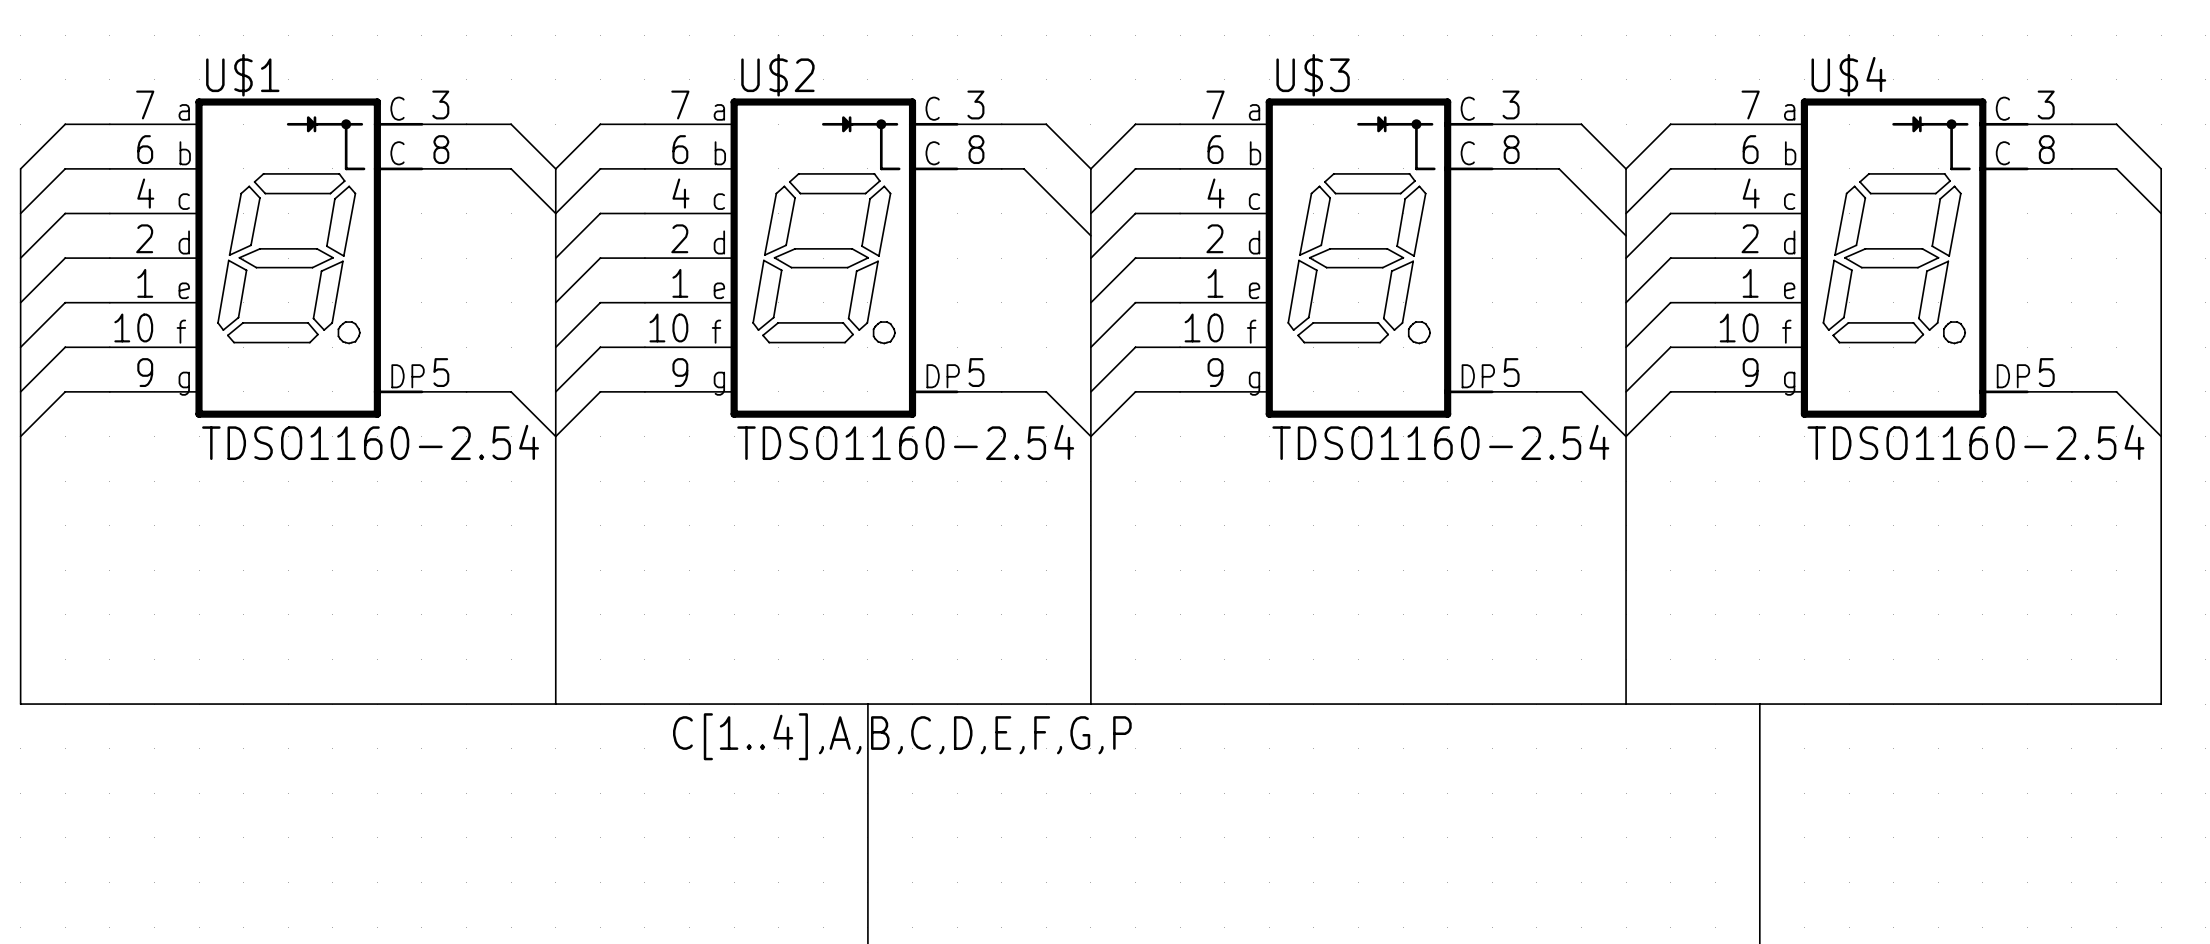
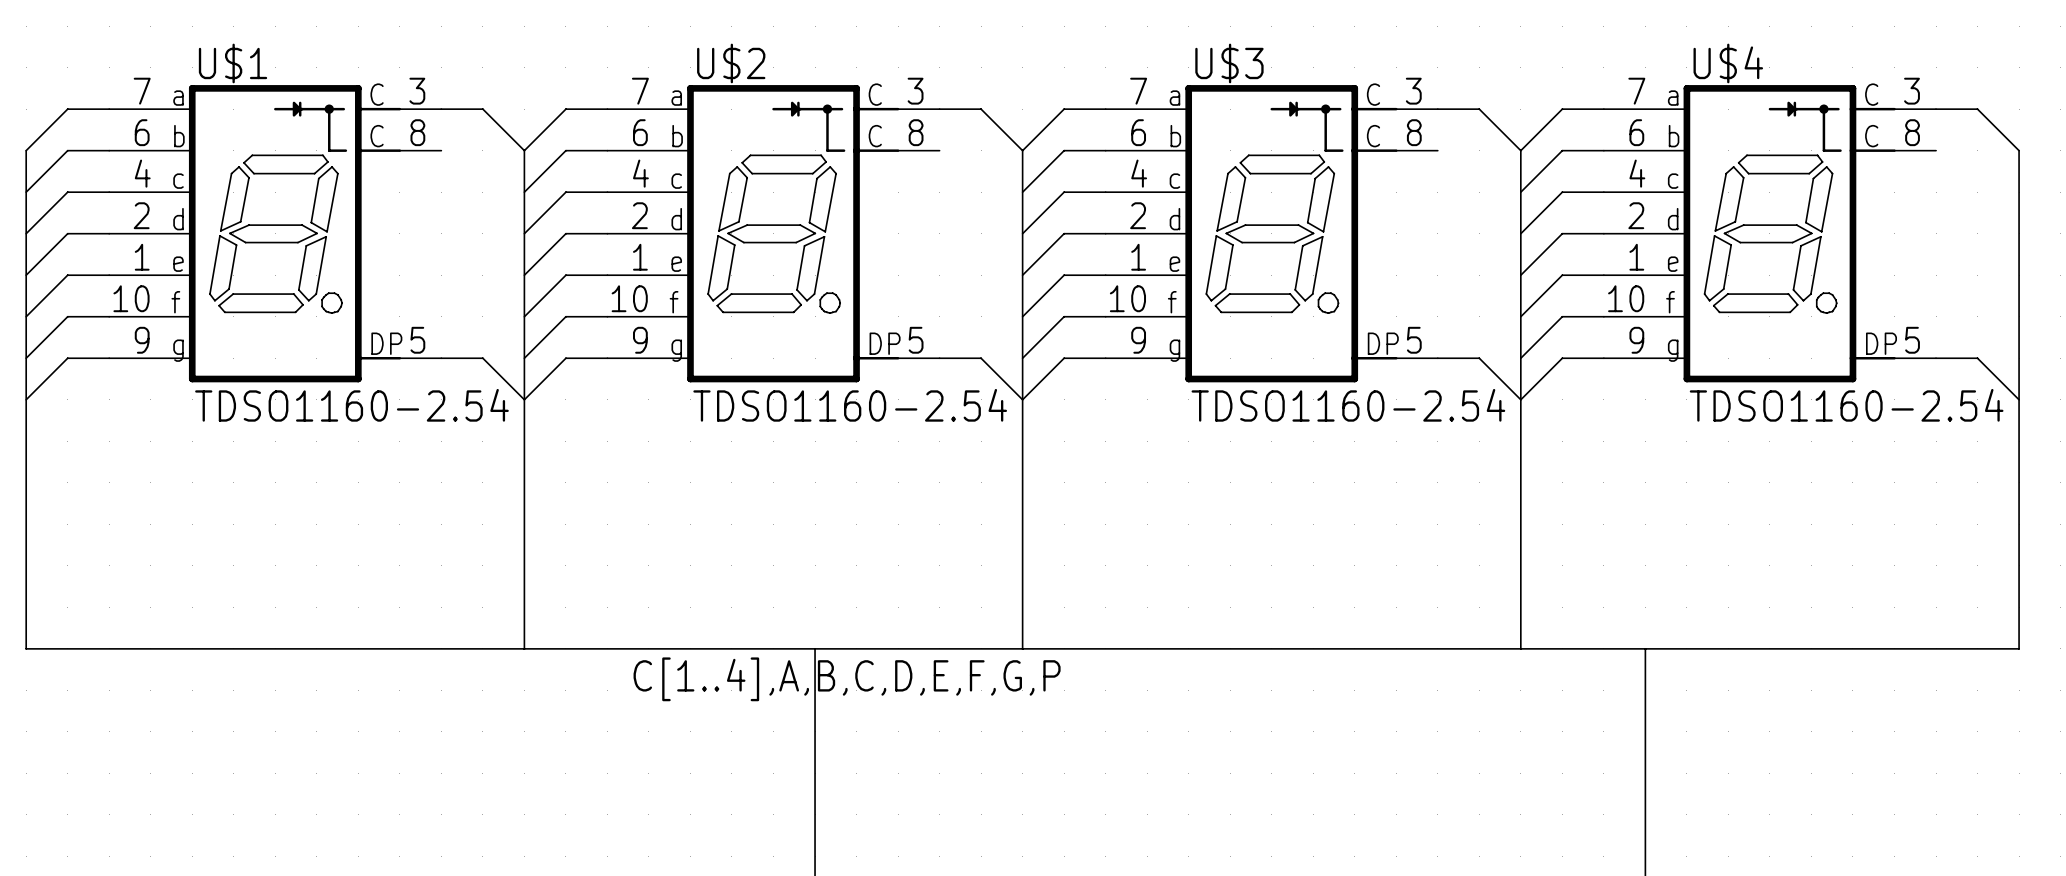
wire: (466, 168) (511, 168) (555, 213) -> none
wire: (1001, 168) (1024, 168) (1090, 235) -> none
wire: (1536, 168) (1559, 168) (1626, 235) -> none
wire: (2071, 168) (2116, 168) (2161, 213) -> none

